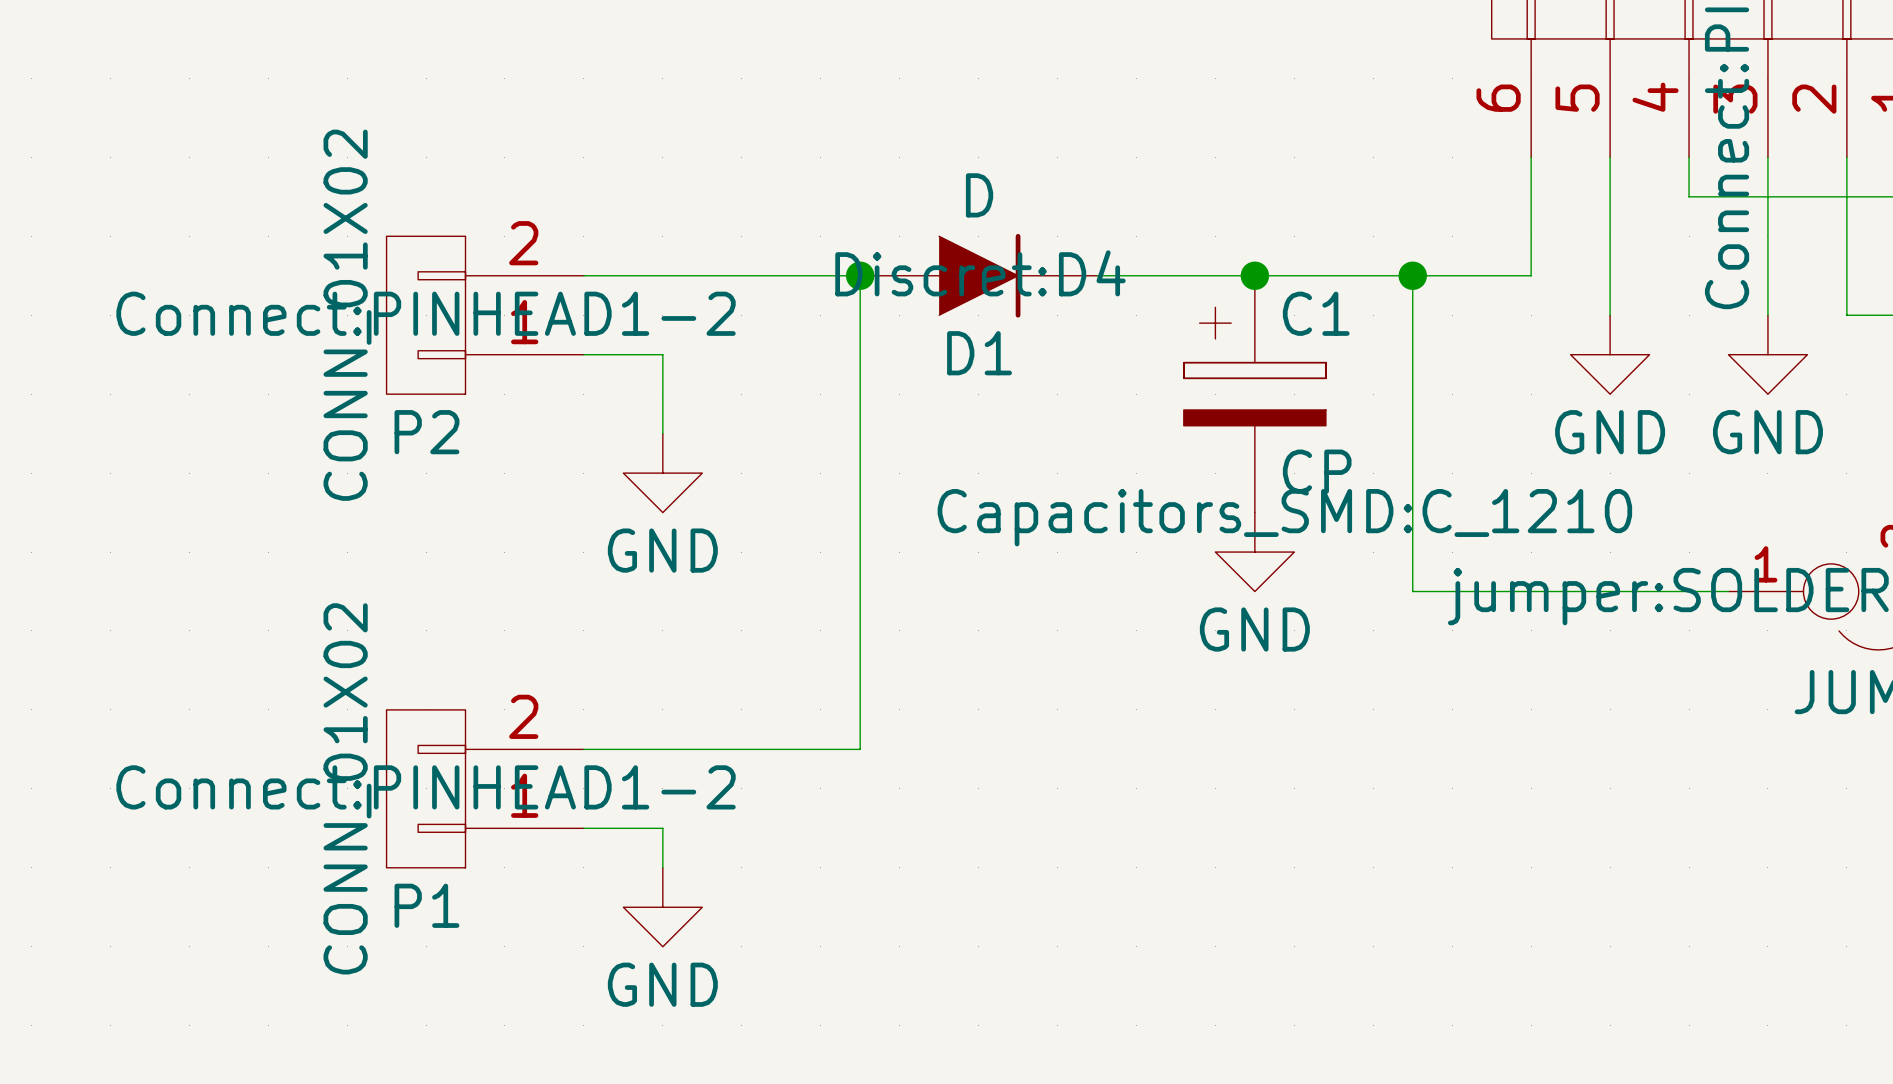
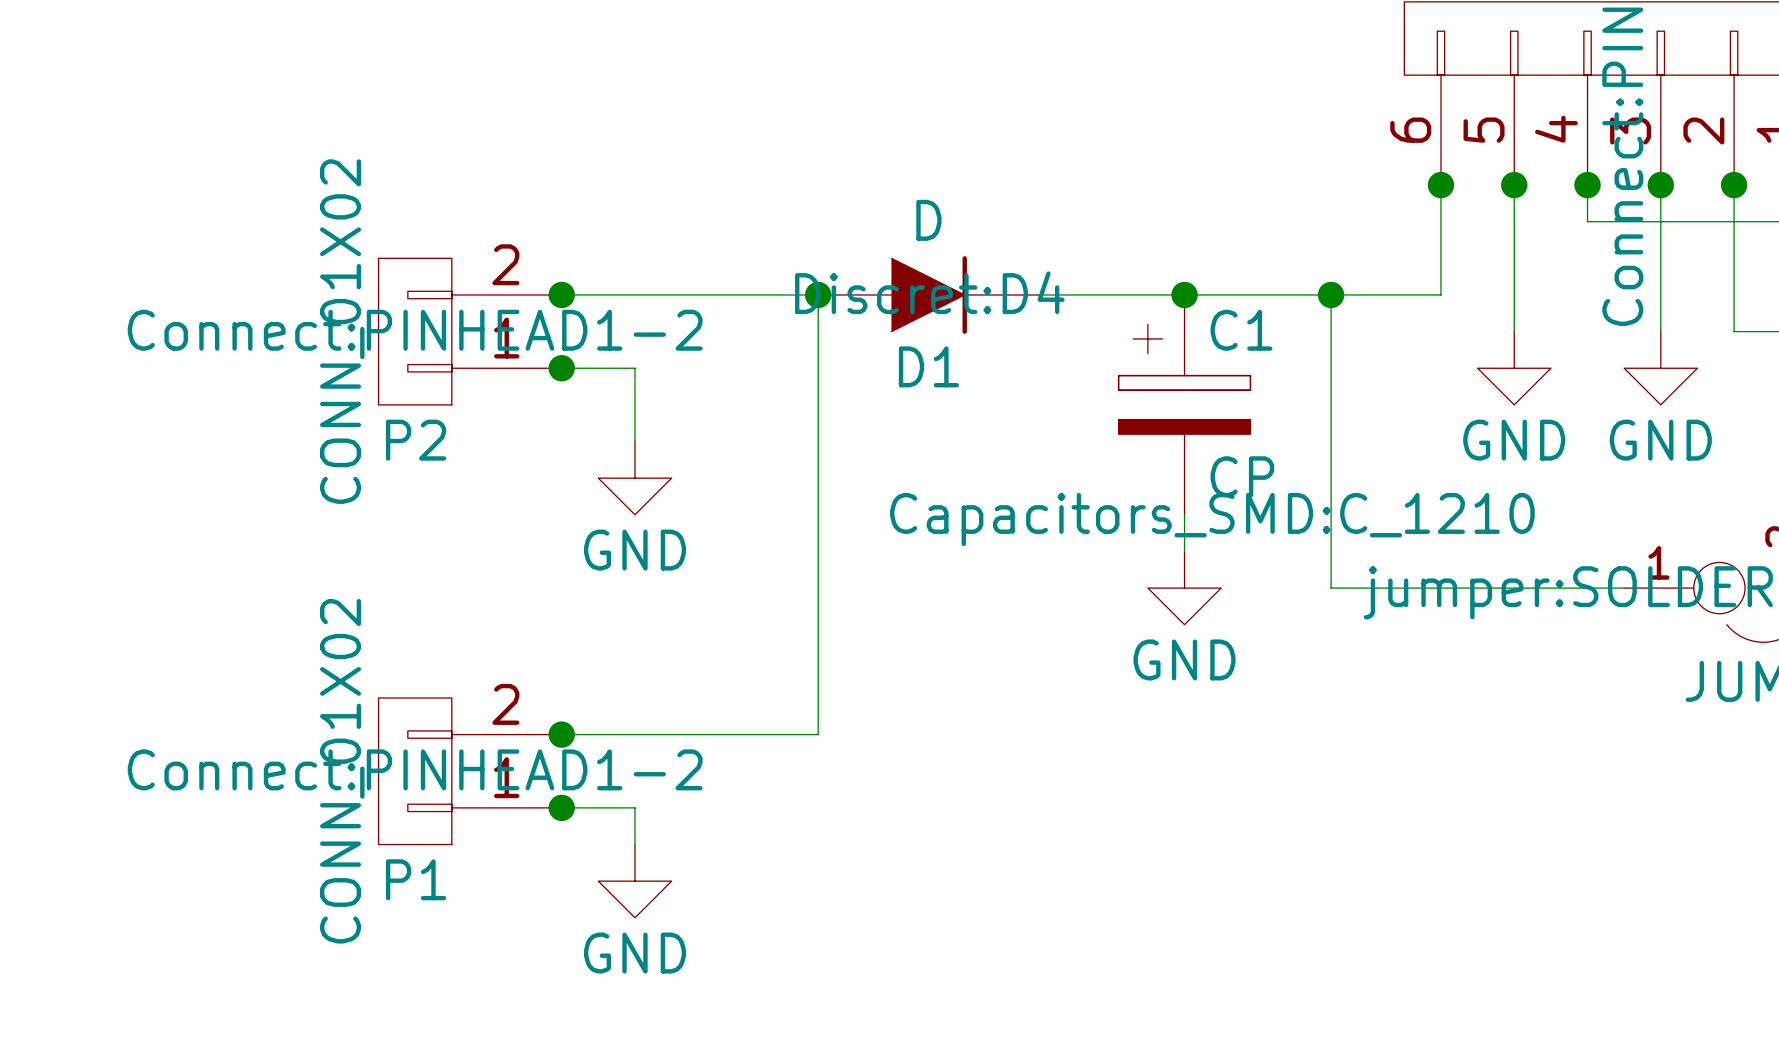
junction: none -> (1440, 185)
junction: none -> (1514, 185)
junction: none -> (1587, 185)
junction: none -> (1660, 185)
junction: none -> (1734, 185)
junction: none -> (561, 294)
junction: none -> (561, 368)
power symbol position: GND (1254, 552) -> GND (1184, 588)
junction: none -> (561, 734)
junction: none -> (561, 807)

